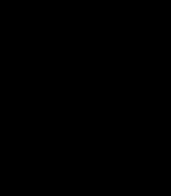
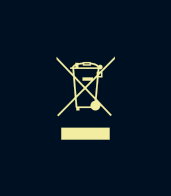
drawing: none -> [56, 56, 115, 140]

